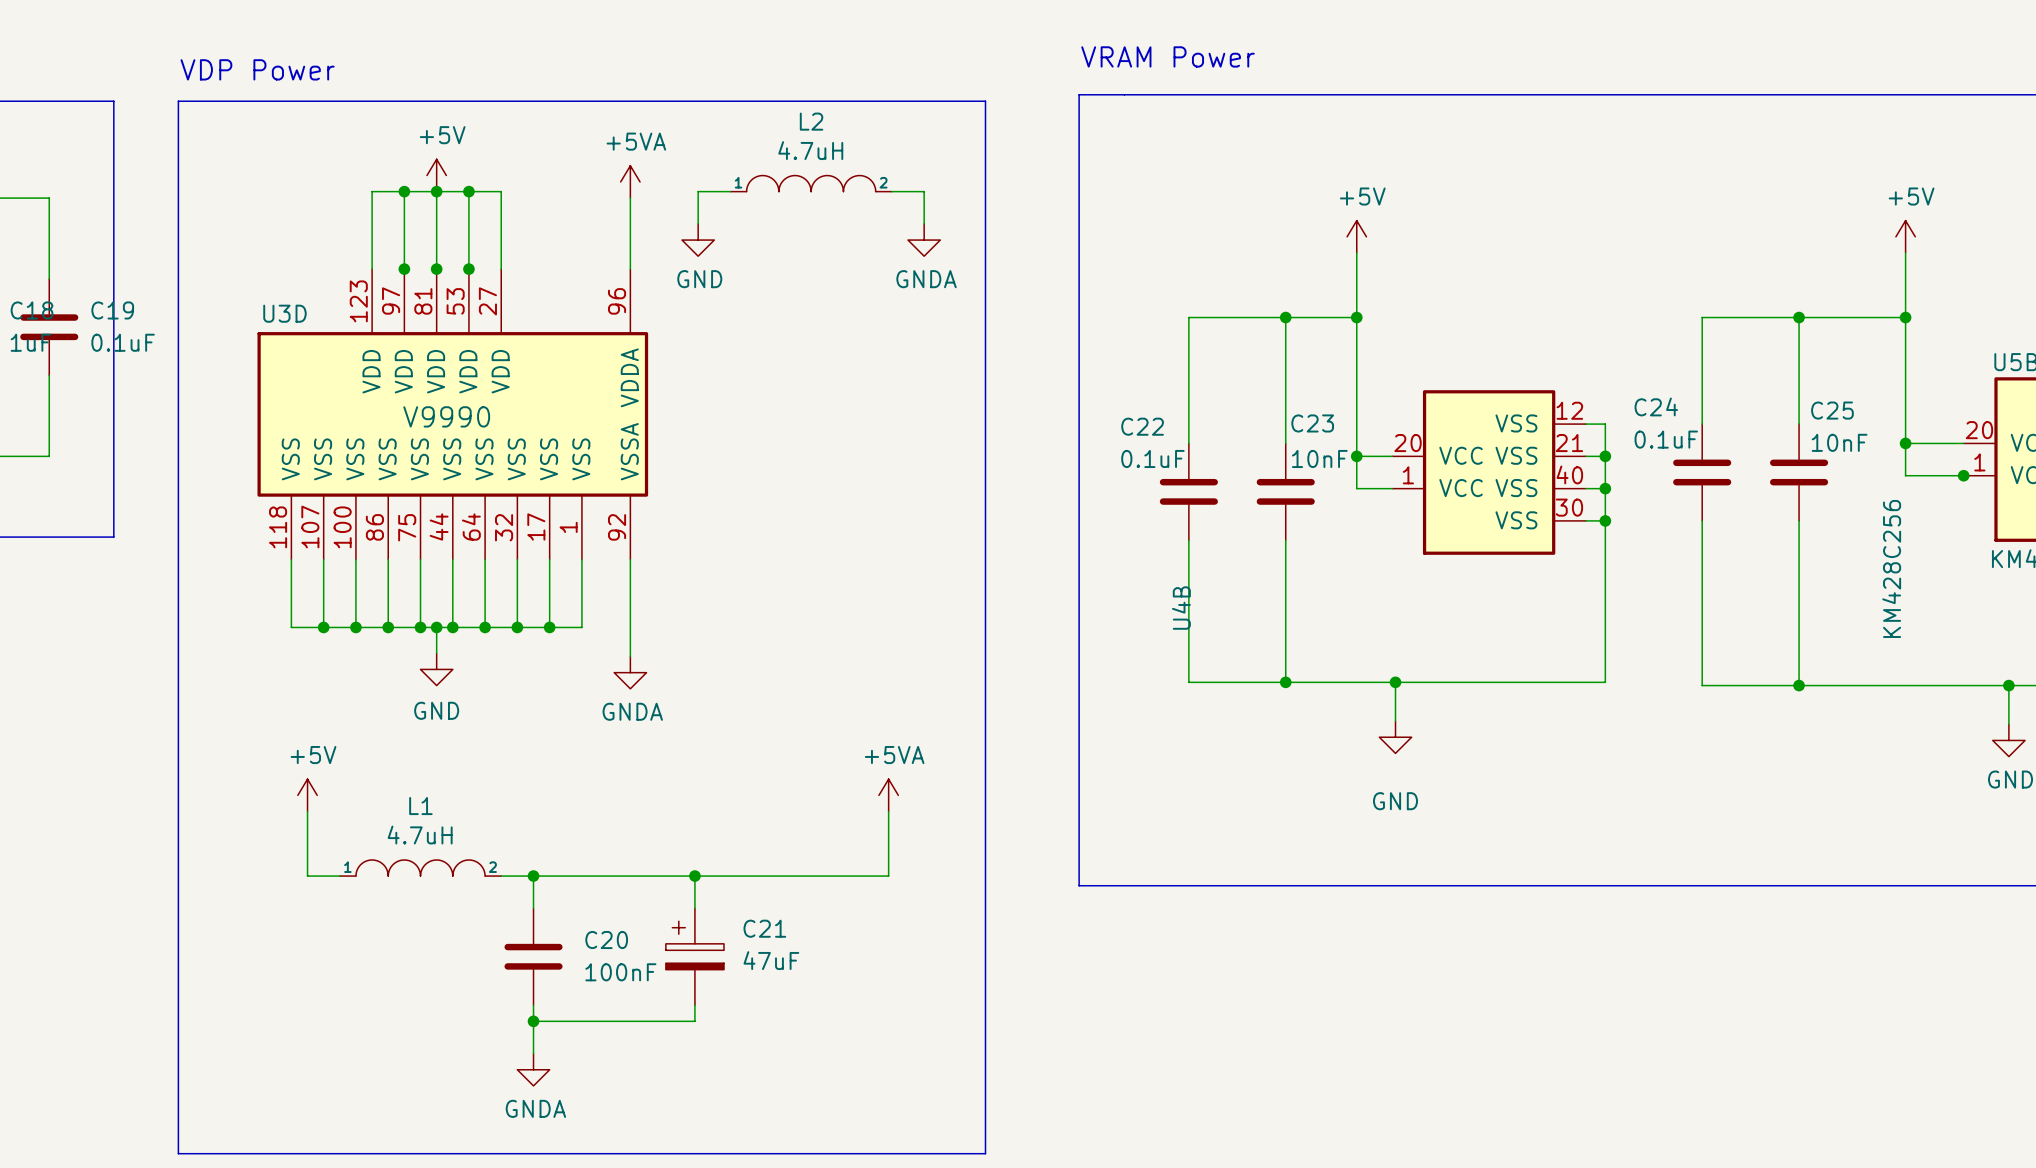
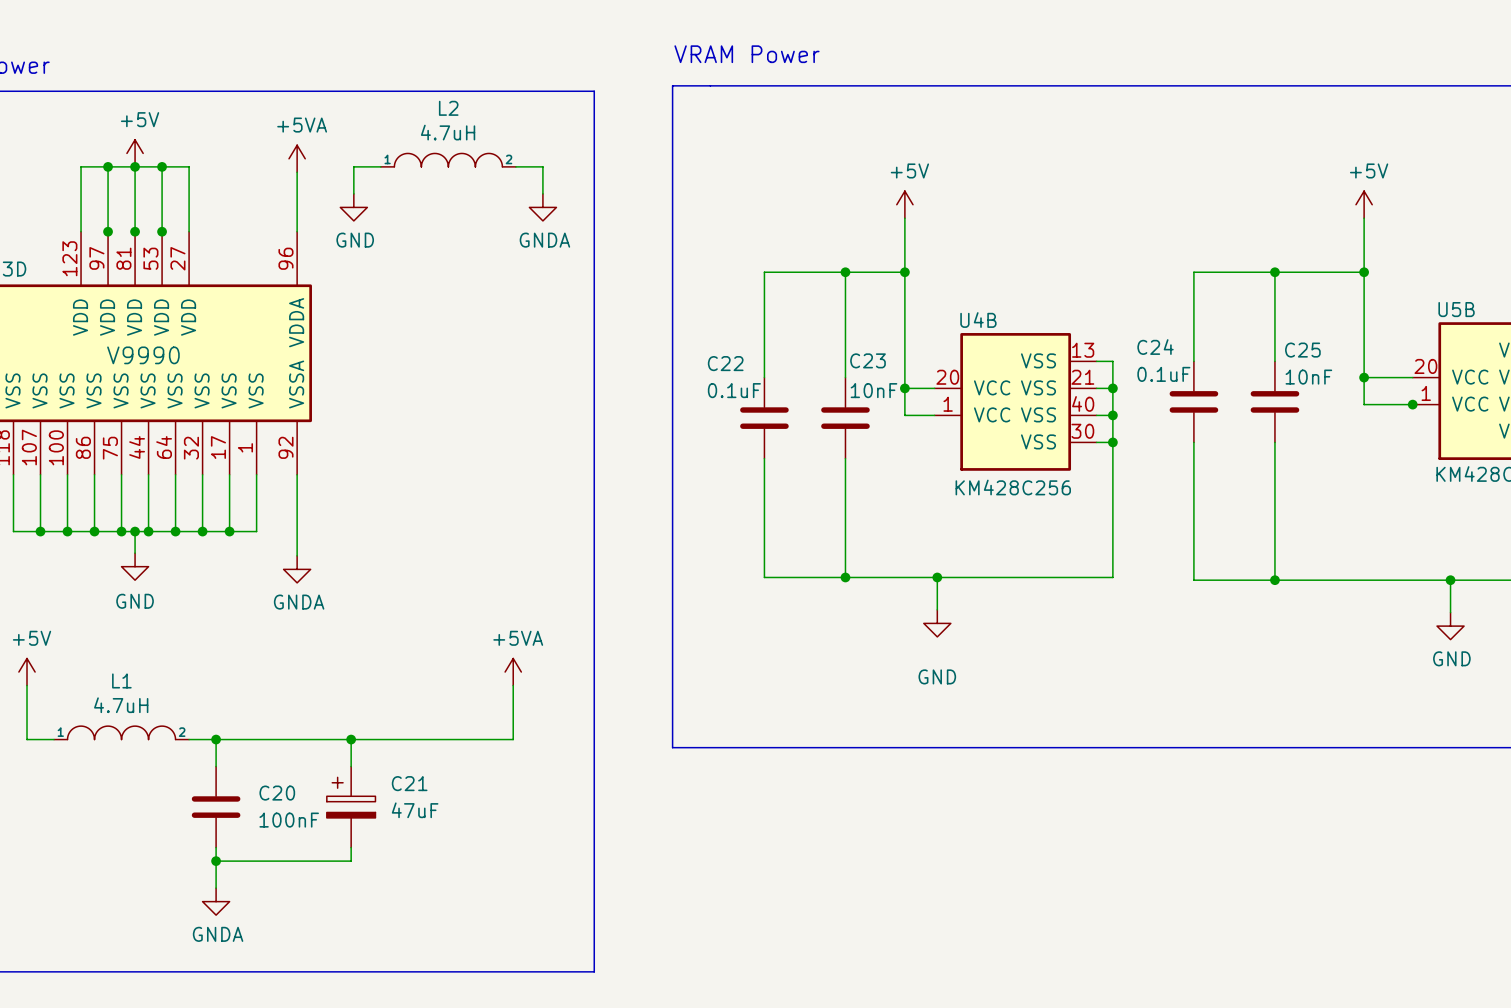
U4B pin number: 12 (1569, 410) -> 13 (1083, 350)
U4B value rotation: 0° (1891, 568) -> 90° clockwise (1013, 487)
U4B value position: KM428C256 (1891, 568) -> KM428C256 (1013, 487)
U4B name rotation: 0° (1181, 608) -> 90° clockwise (978, 320)
U4B name position: U4B (1181, 608) -> U4B (978, 320)

